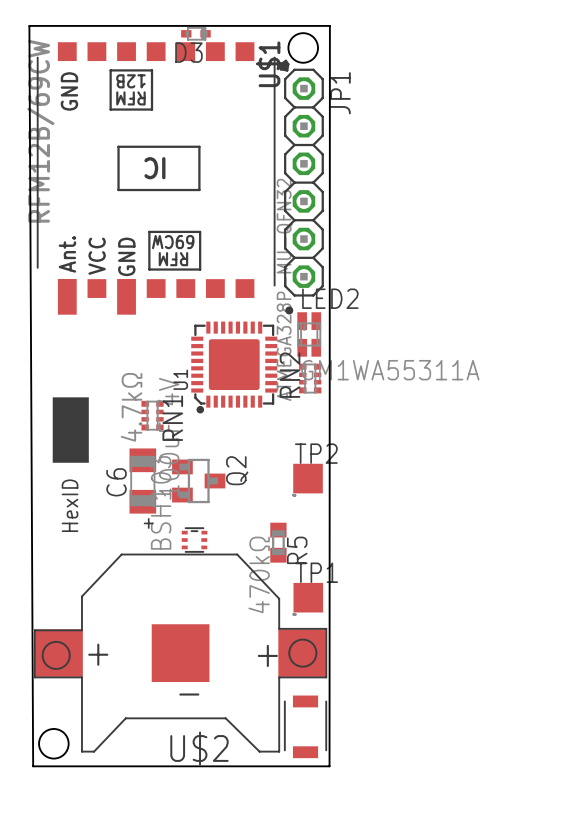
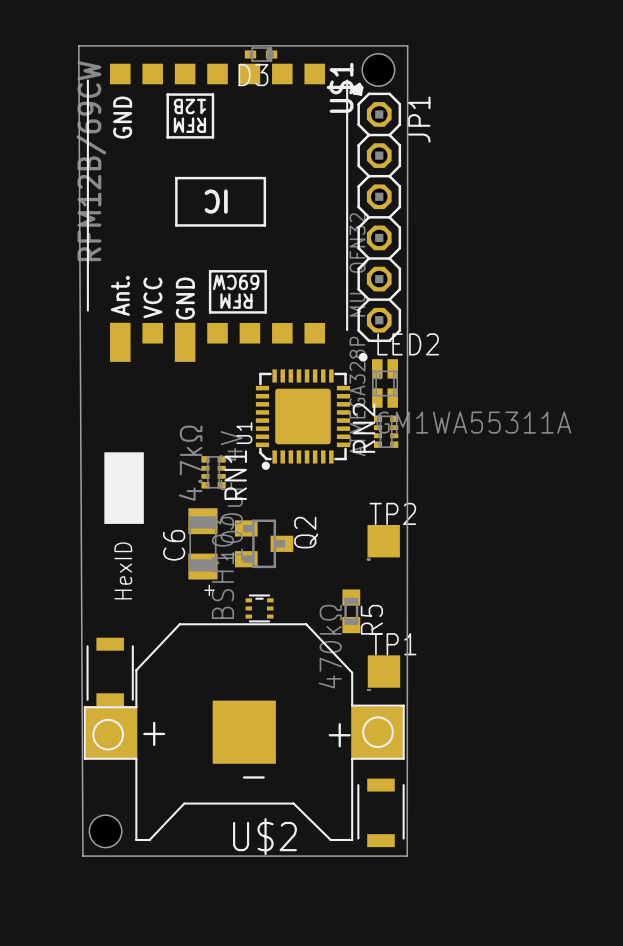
part: none -> (110, 671)

